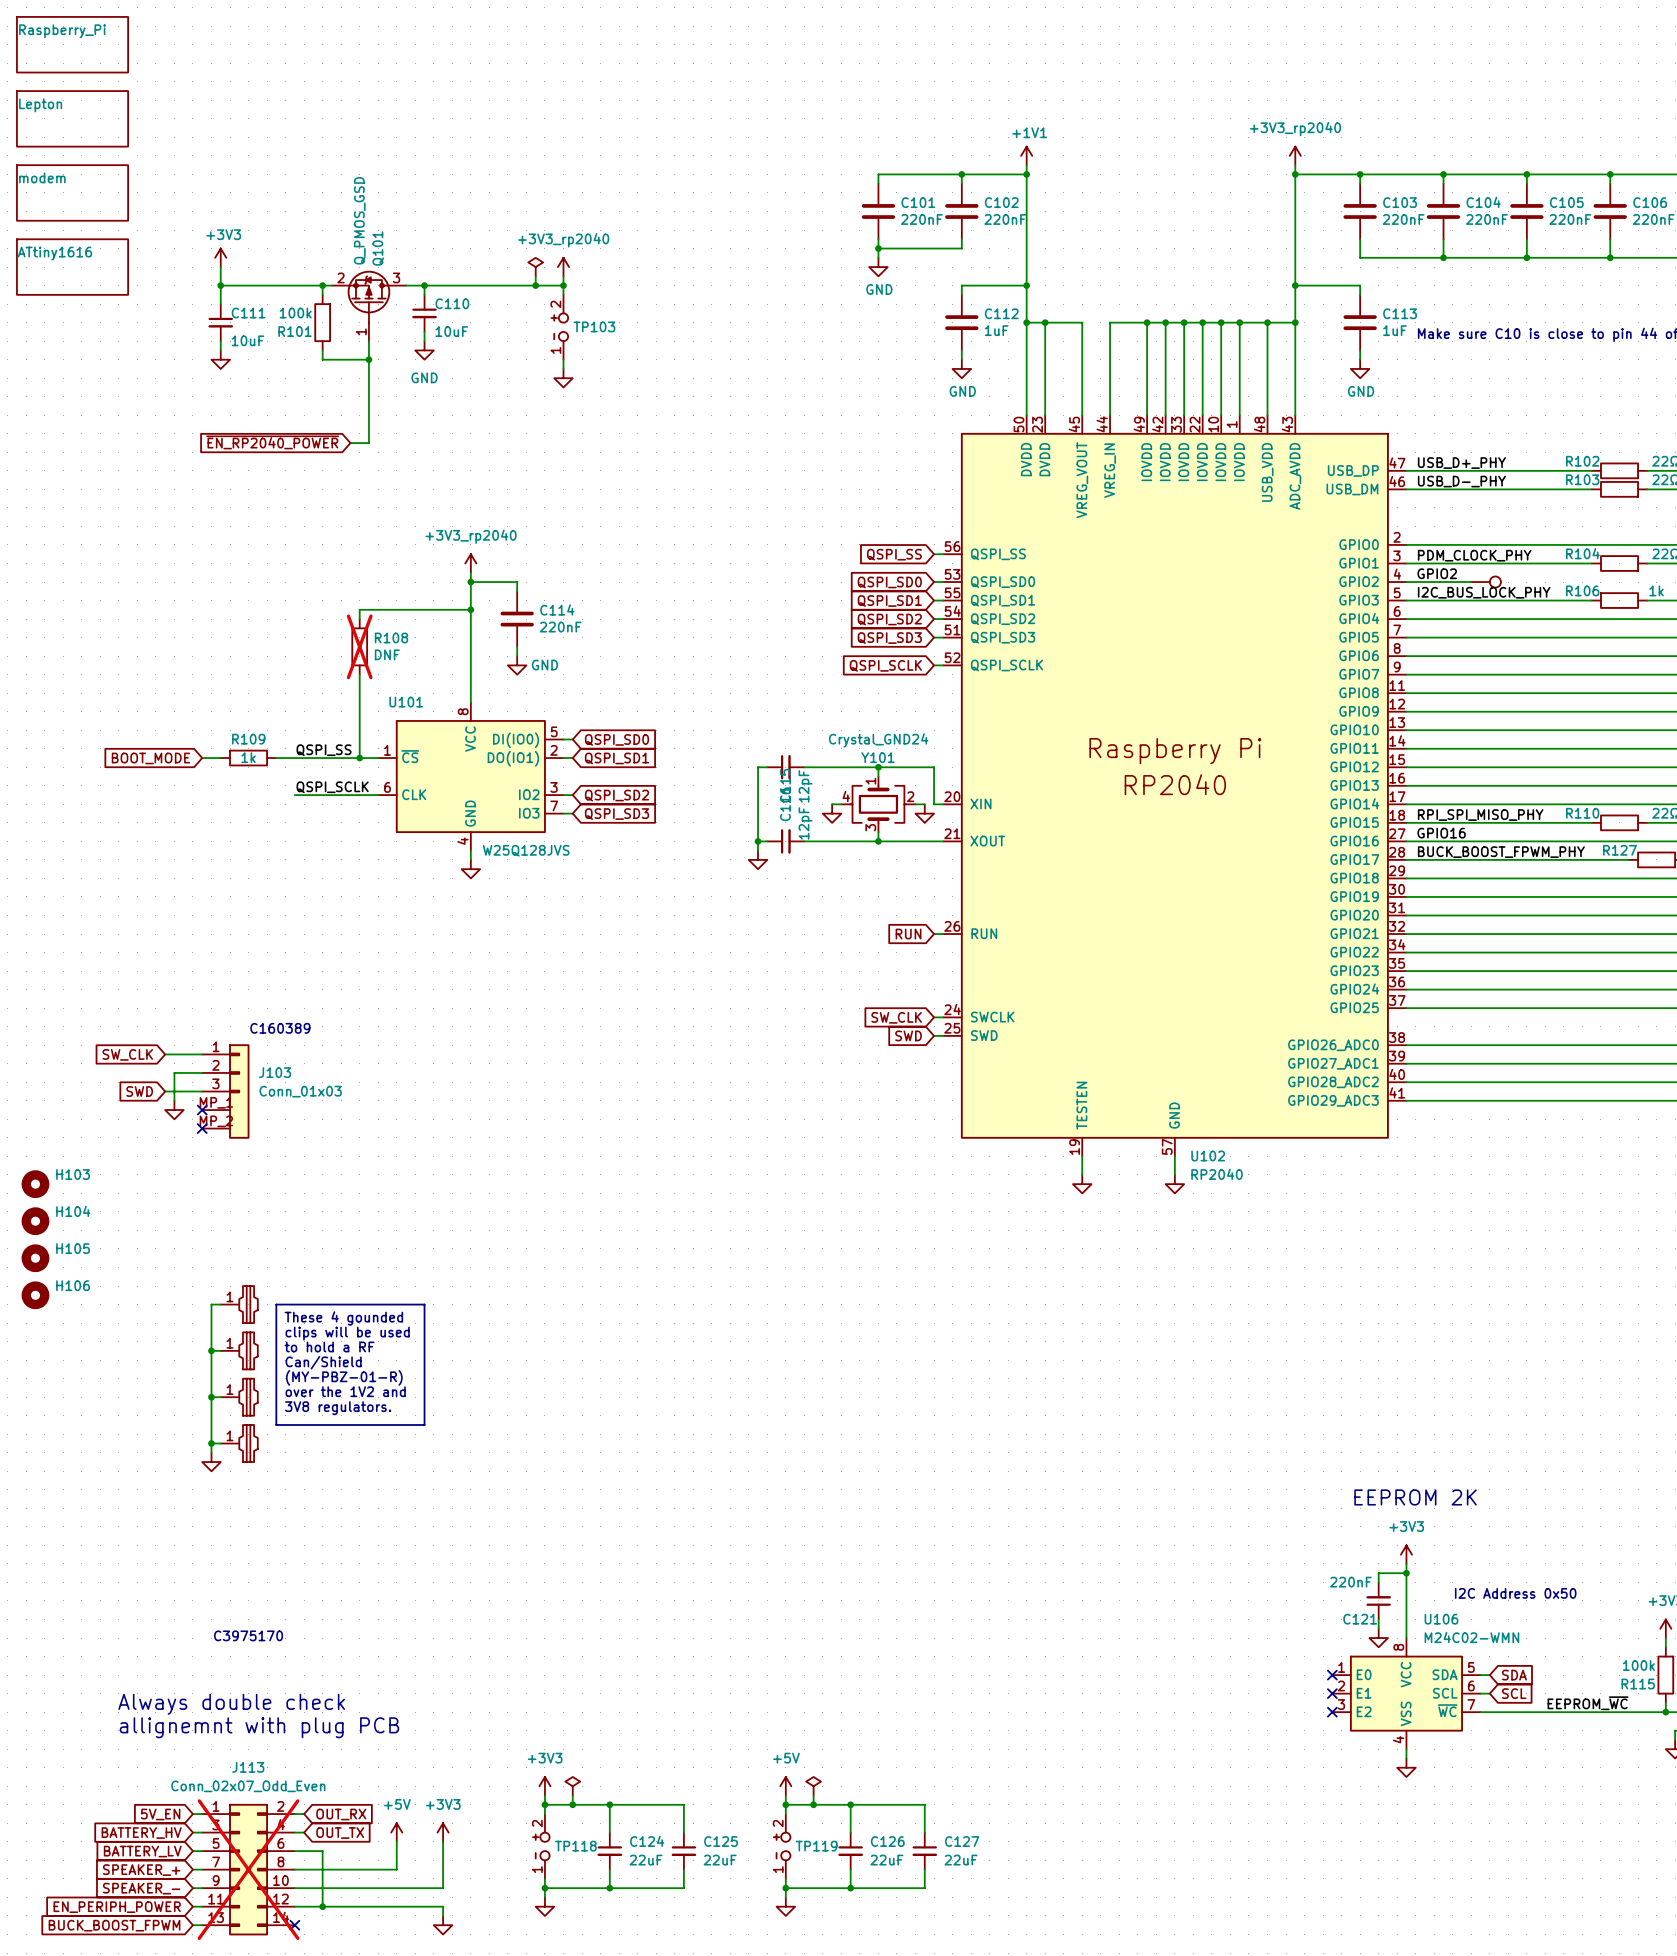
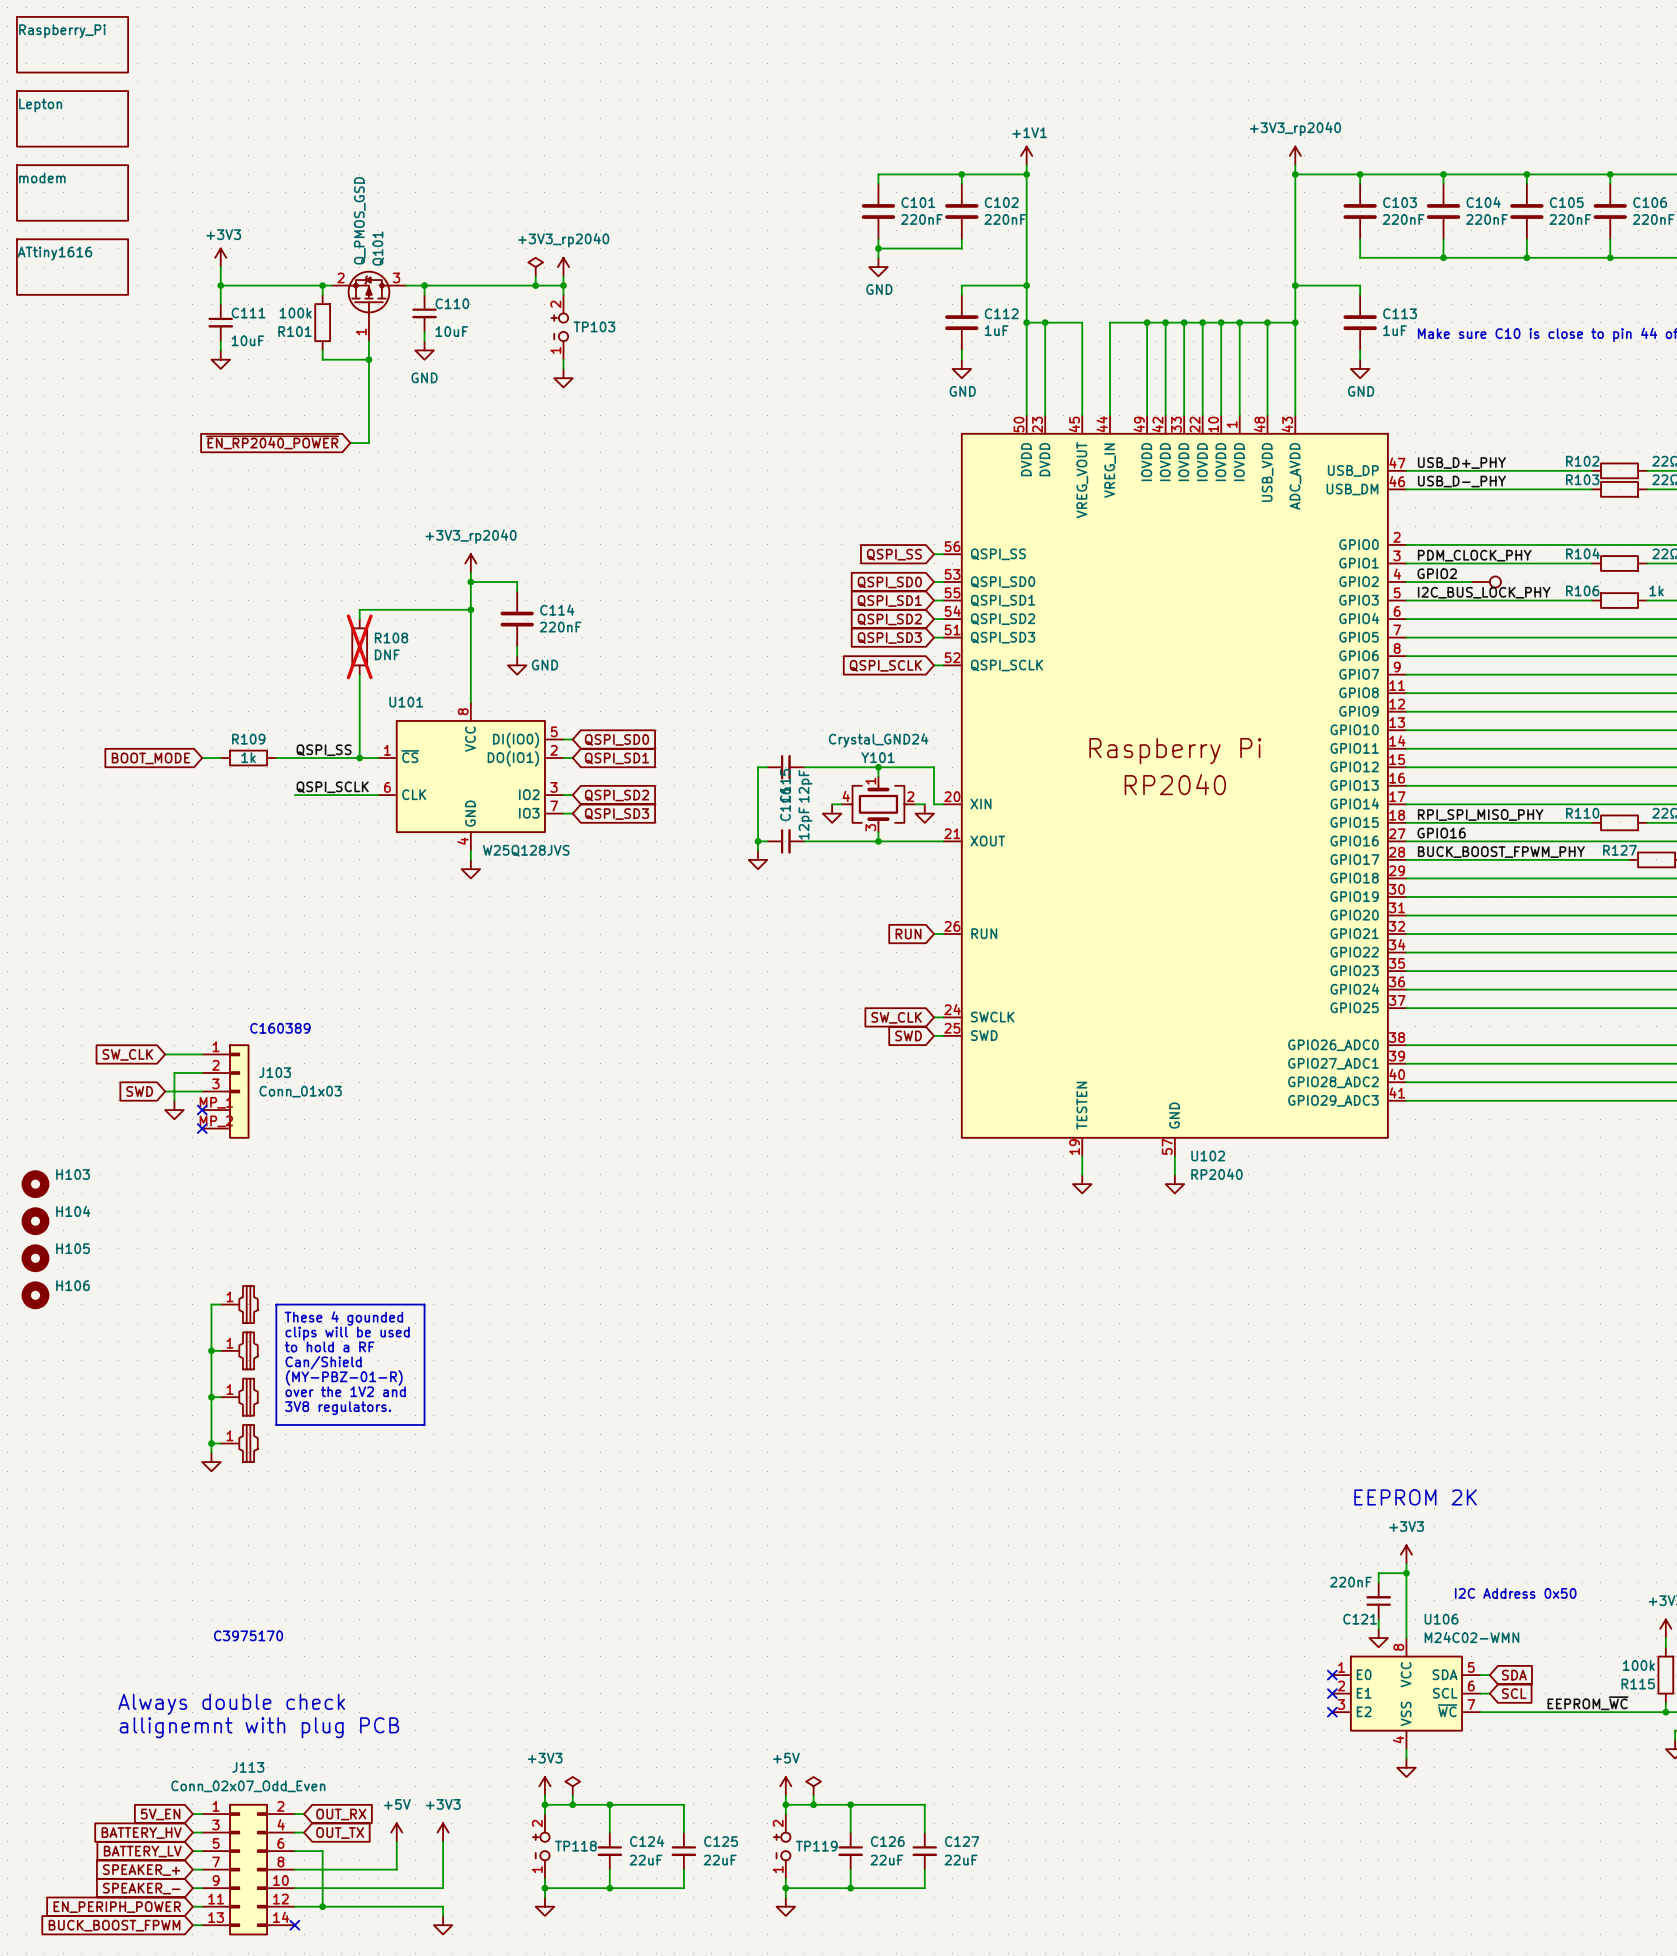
J113 do-not-place cross: (248, 1869) -> none

